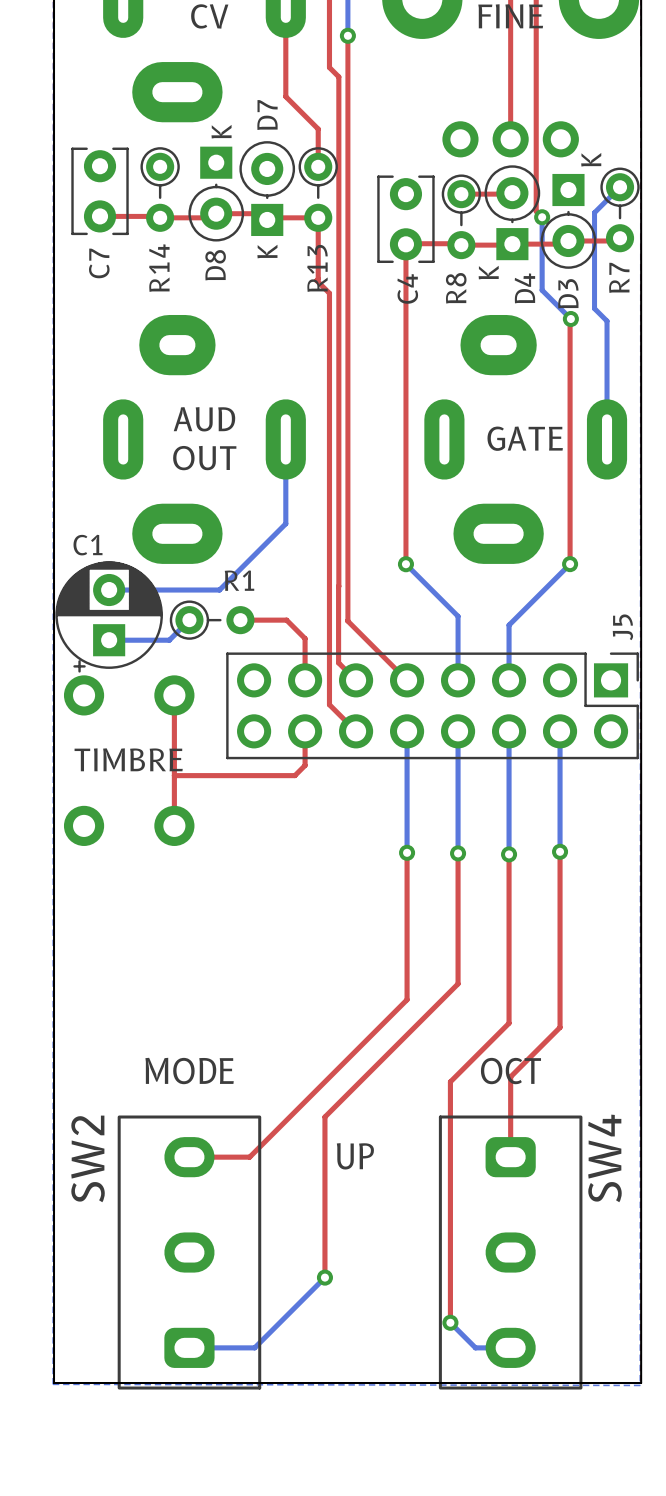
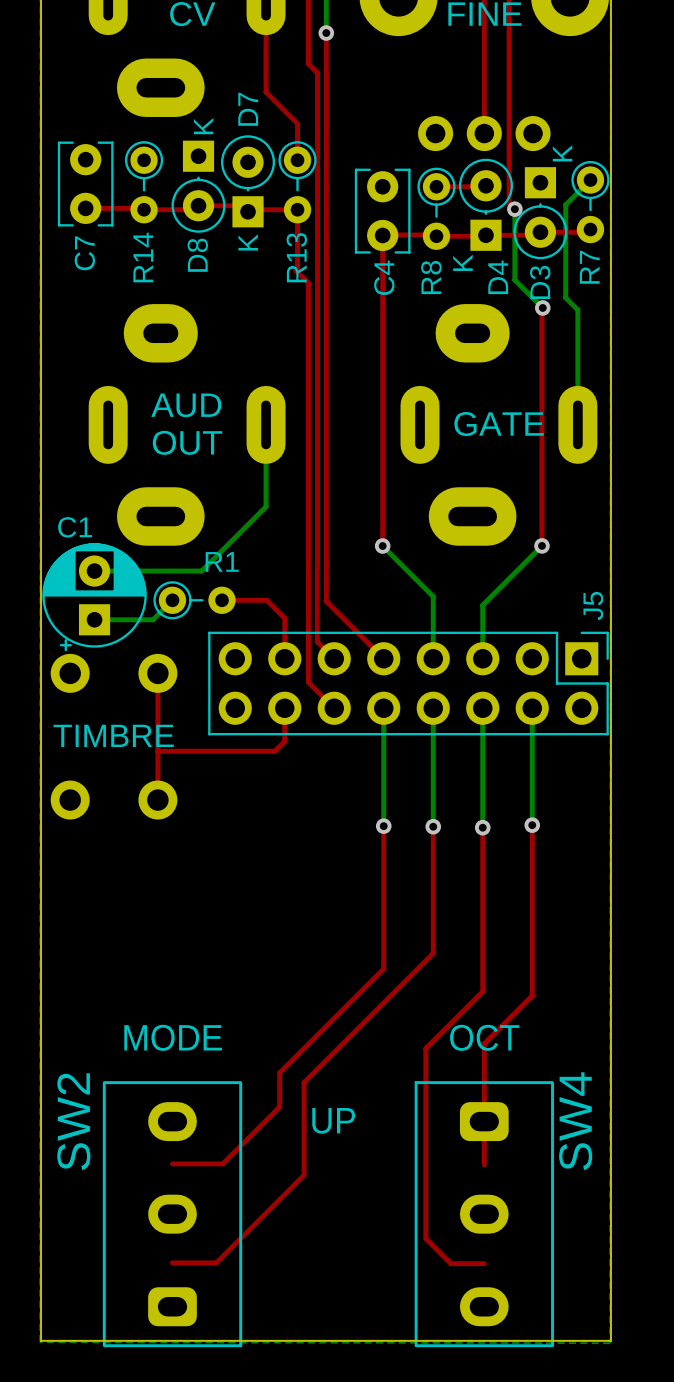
top track: (299, 1106) (249, 1157) (189, 1157) -> (279, 1072) (279, 1106) (222, 1163) (172, 1163)
top track: none -> (484, 1121) (484, 1164)
top track: (324, 1212) (324, 1277) -> (304, 1175) (216, 1262) (172, 1262)
bottom track: (324, 1277) (254, 1347) (189, 1347) -> none
via: (324, 1277) -> none
top track: (450, 1277) (450, 1322) -> (425, 1238) (450, 1263) (484, 1263)
bottom track: (450, 1322) (475, 1347) (510, 1347) -> none
via: (450, 1322) -> none

